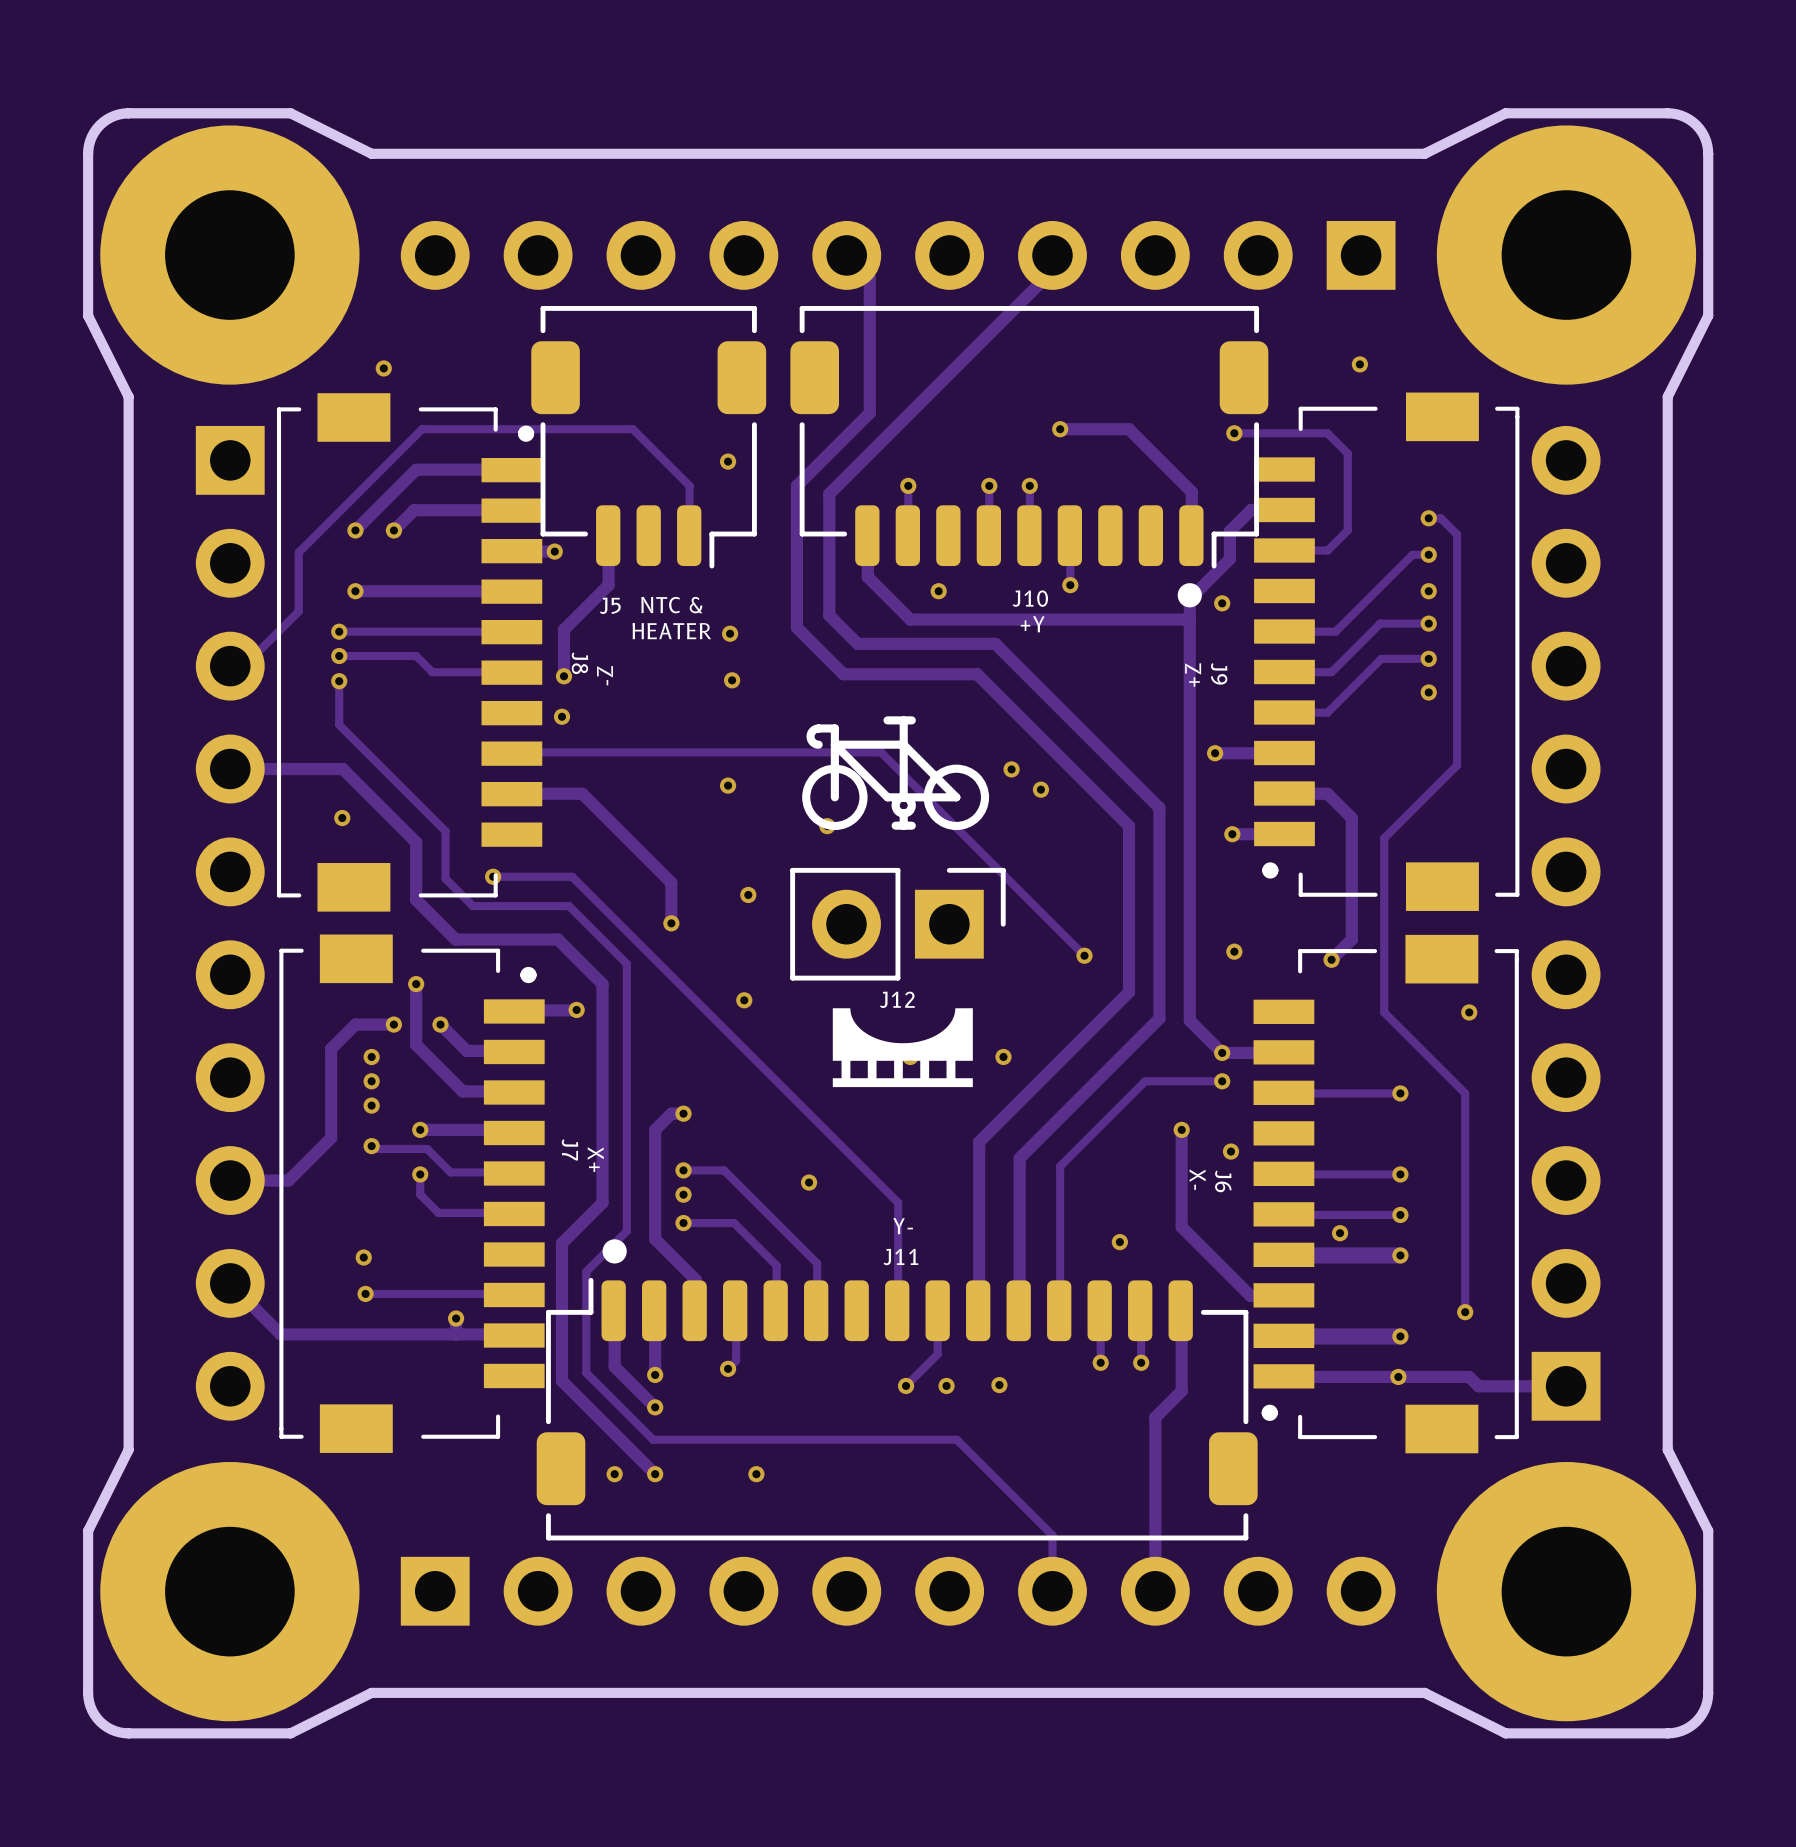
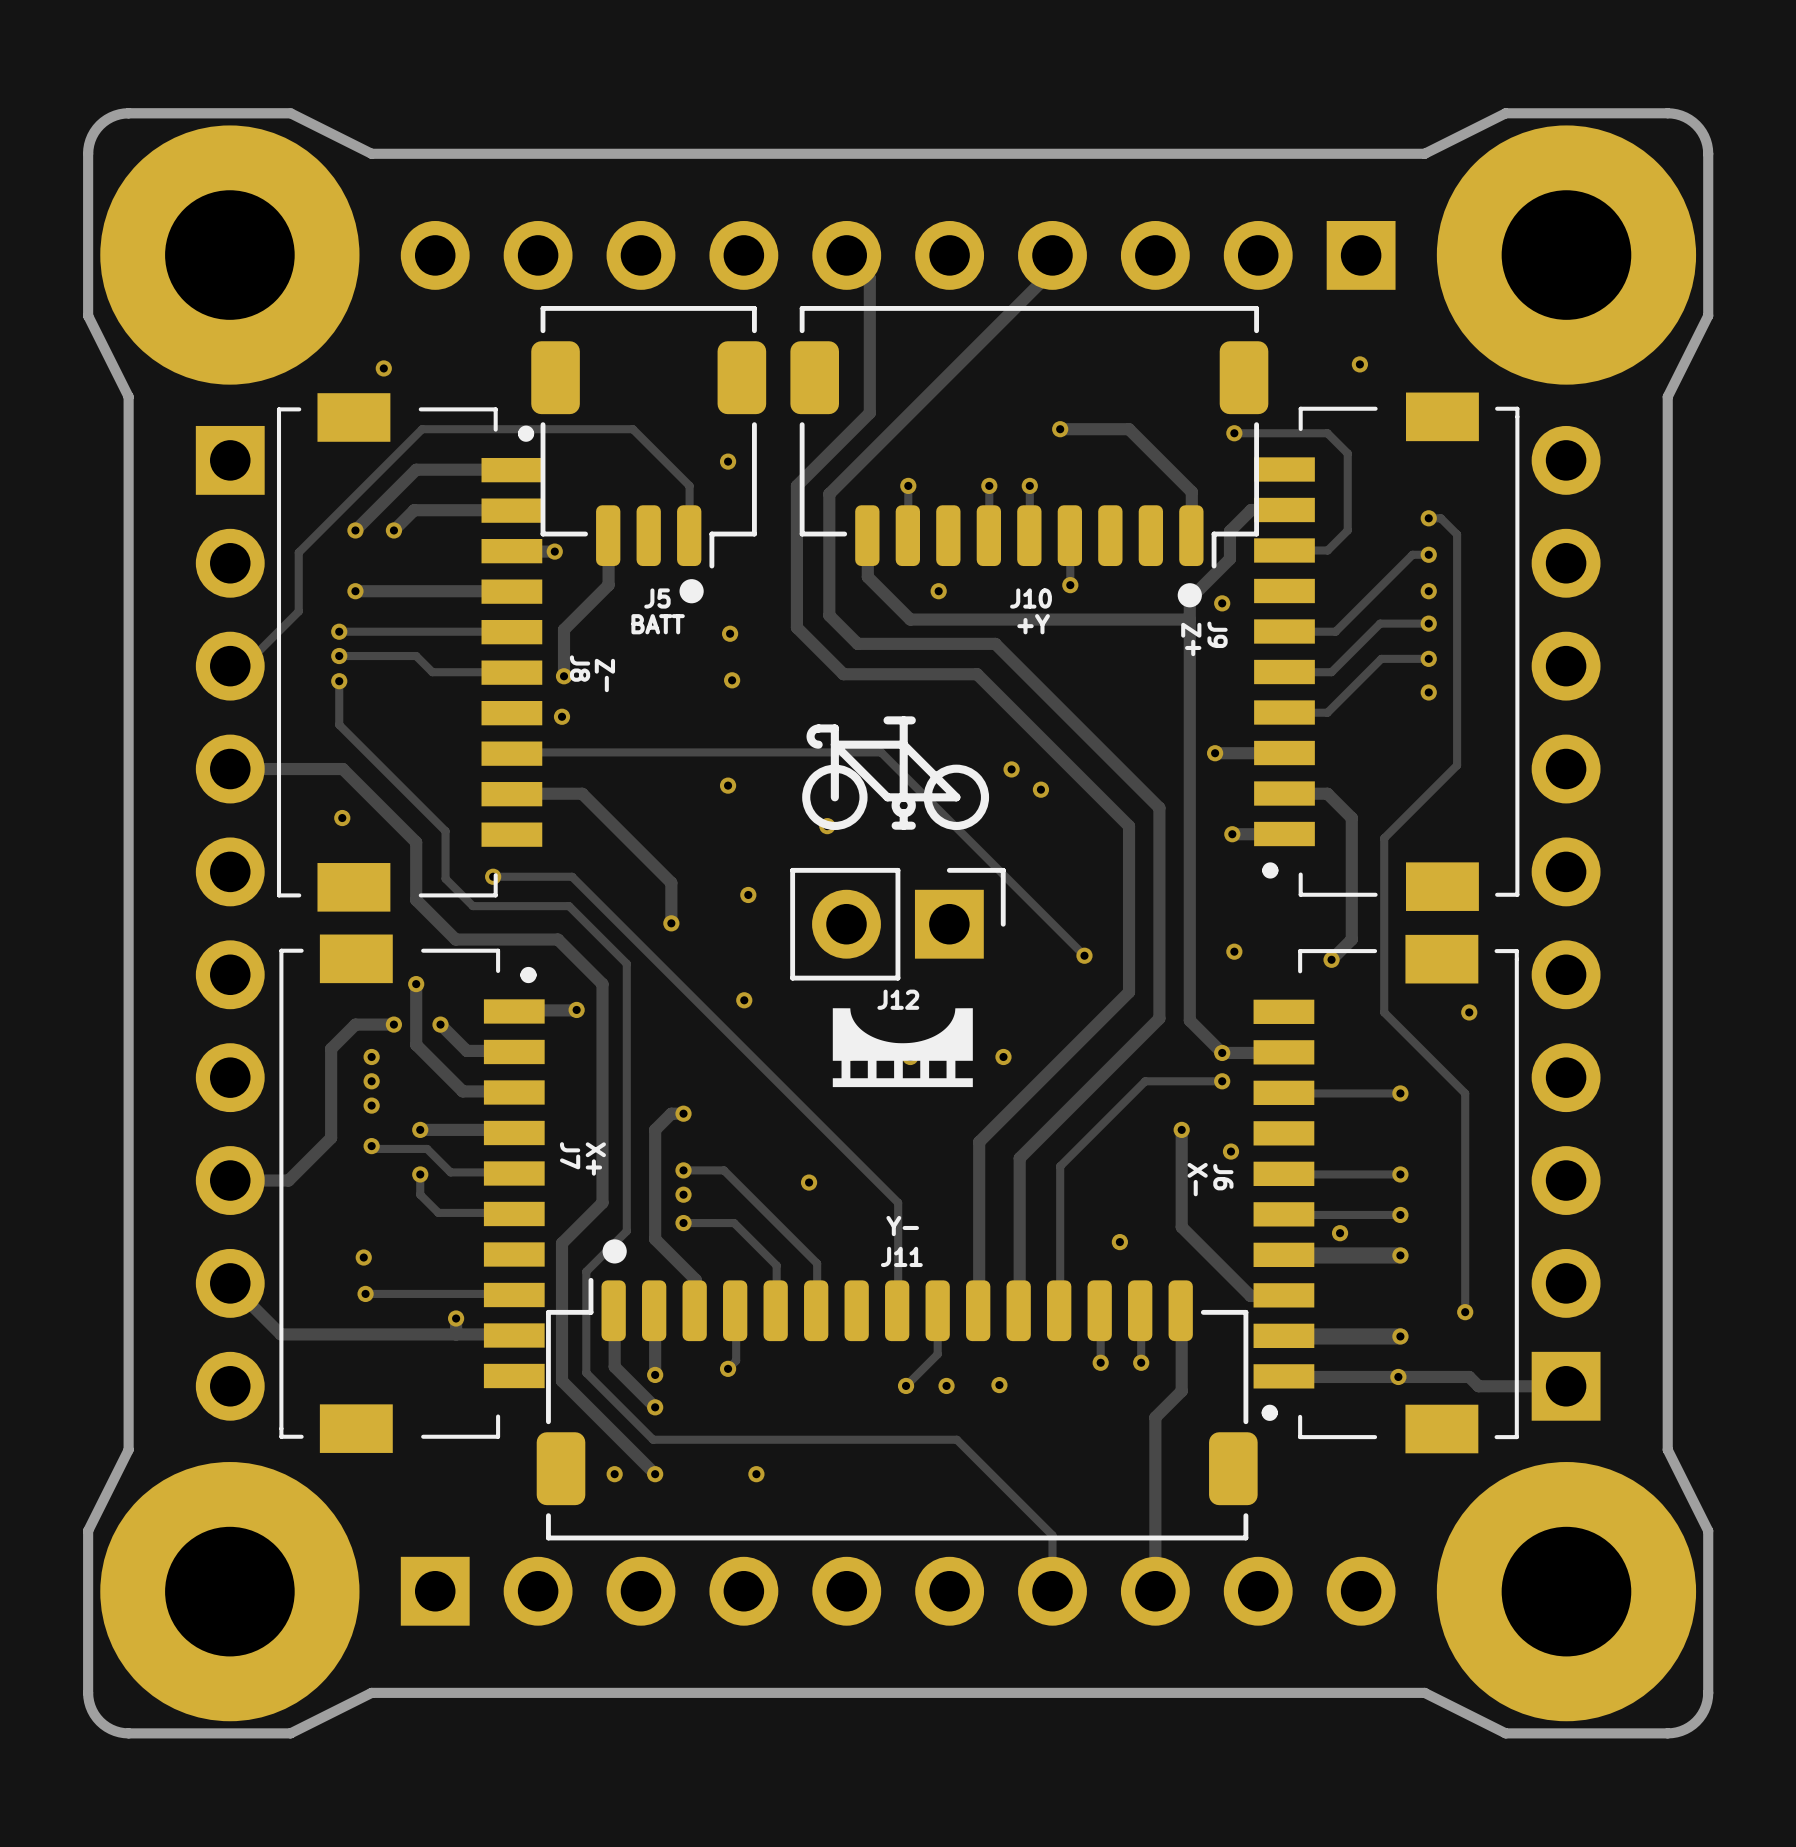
drawing: none -> [679, 579, 704, 604]
J5 name position: J5 (610, 605) -> J5 (657, 598)
text: NTC & (671, 605) -> none
text: none -> BATT (658, 624)
text: HEATER (671, 631) -> none
J9 name position: J9 (1219, 673) -> J9 (1217, 634)
text position: +Z (1193, 675) -> +Z (1191, 639)

